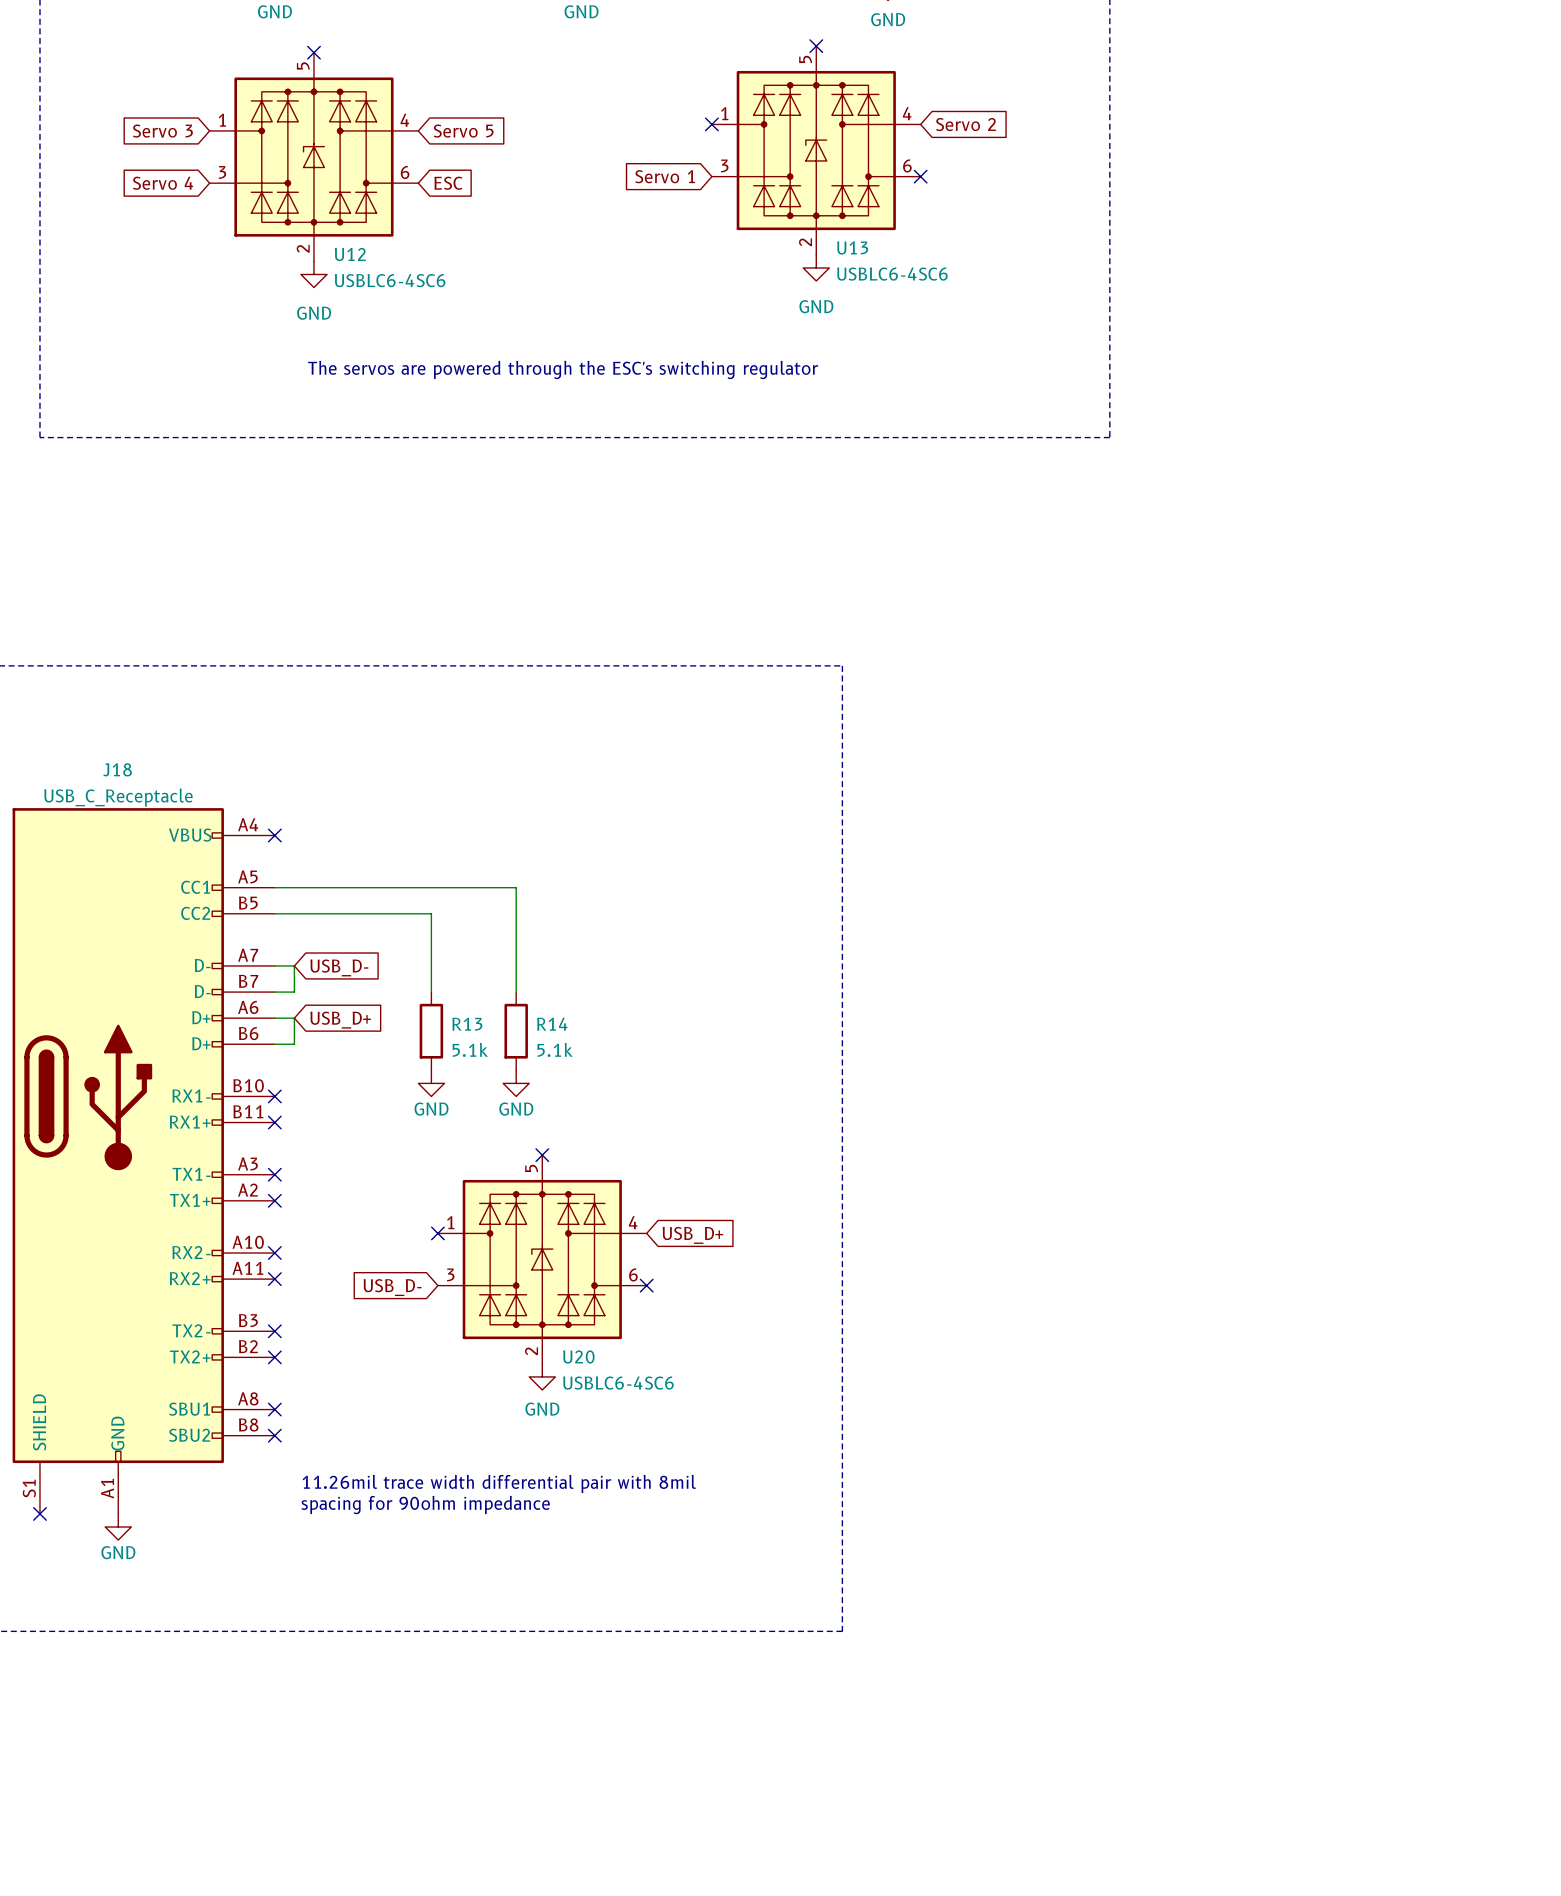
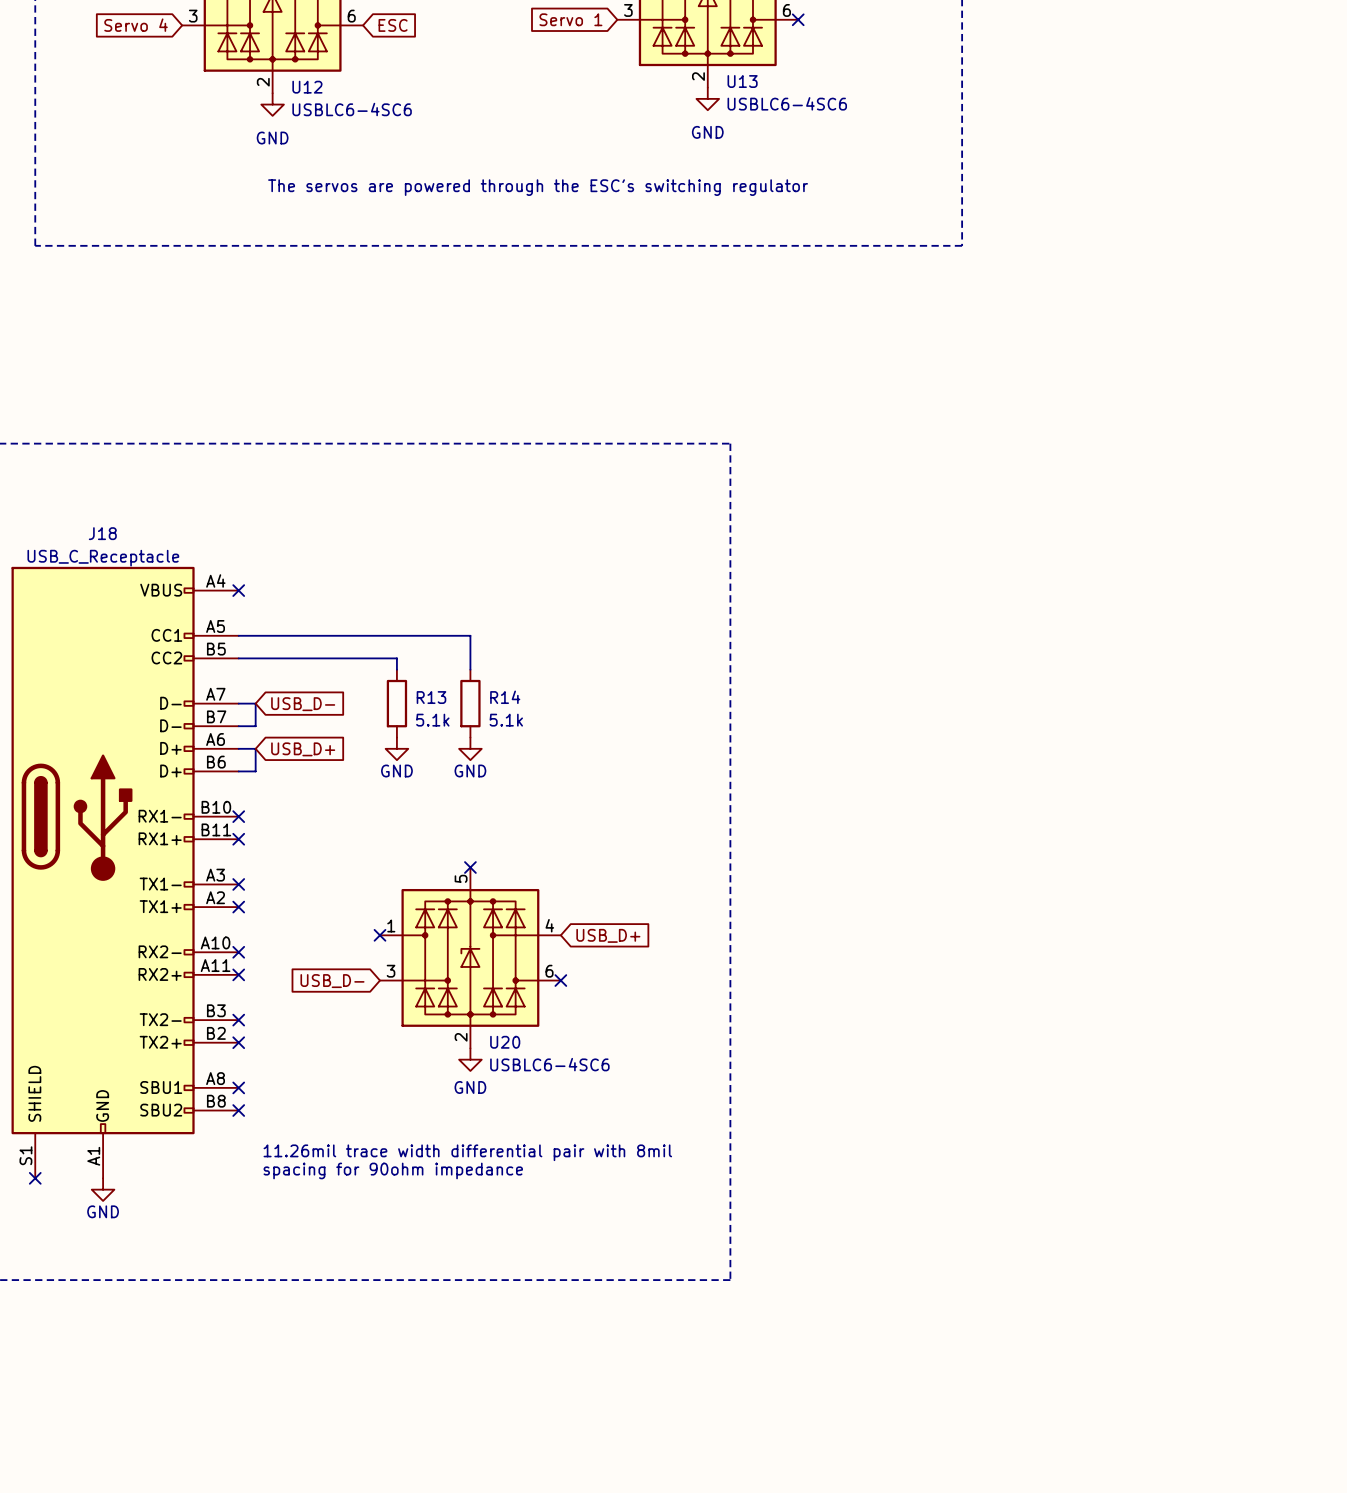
wire: (516, 887) (516, 992) -> (447, 635) (470, 635) (470, 669)
wire: (431, 913) (431, 992) -> (374, 658) (396, 658) (396, 669)
power symbol: none -> GND (396, 748)
power symbol: none -> GND (470, 748)
R13 position: (431, 1031) -> (396, 703)
R14 position: (516, 1031) -> (470, 703)
power symbol: GND (431, 1083) -> none
power symbol: GND (516, 1083) -> none

